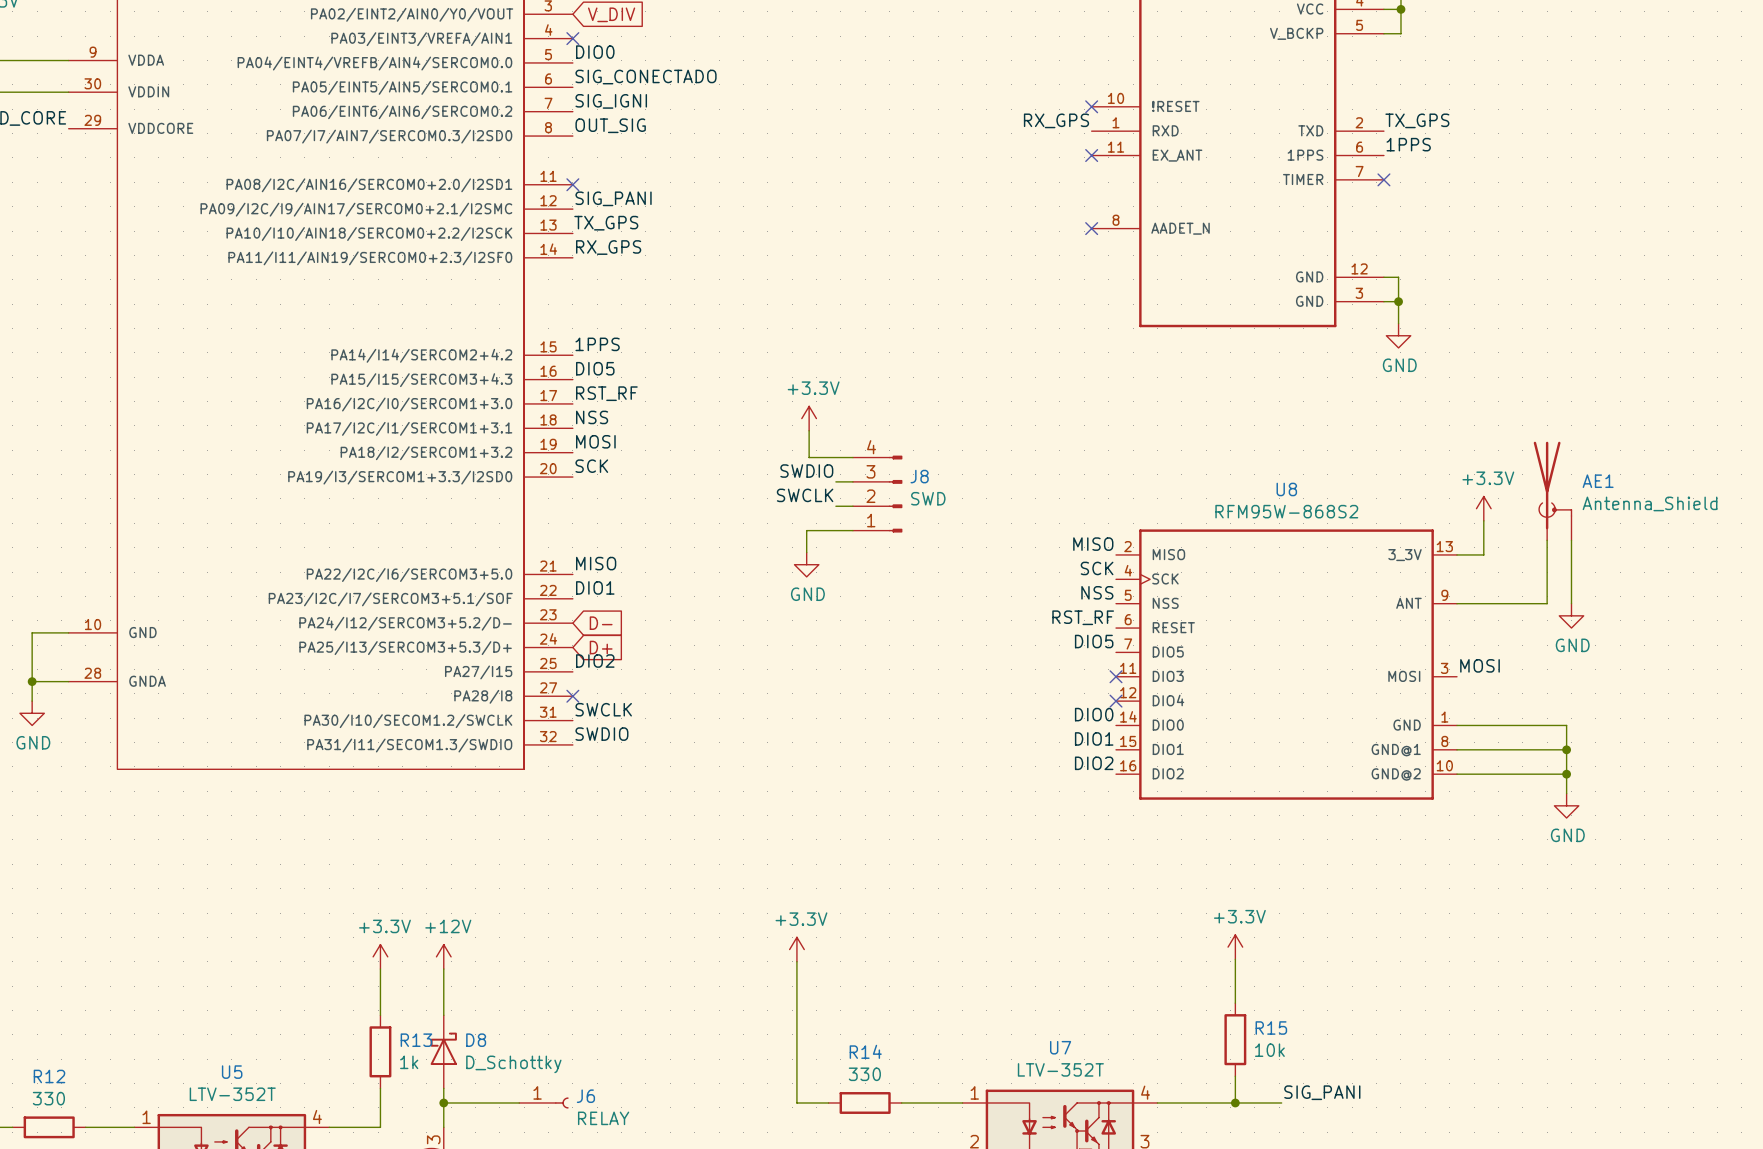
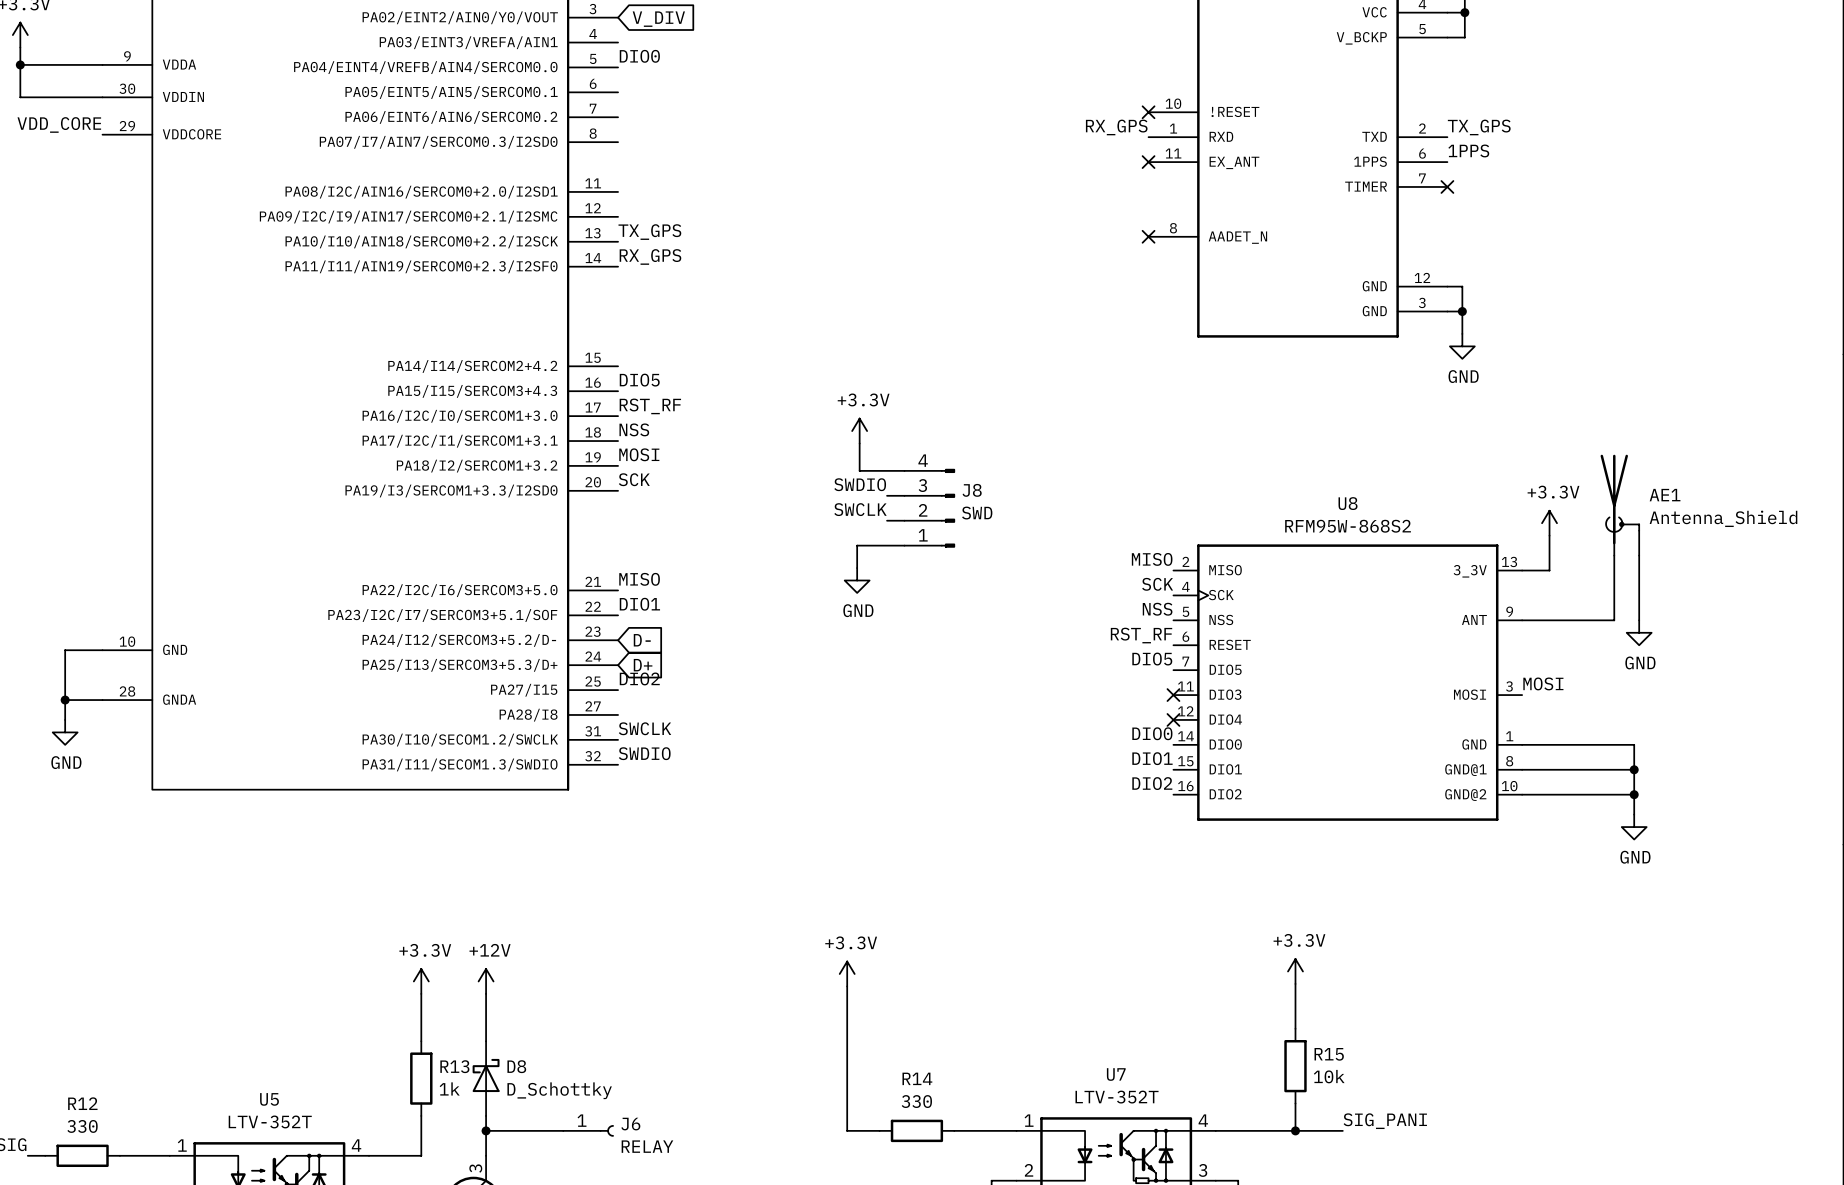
no-connect mark: (572, 38) -> none
label: SIG_CONECTADO (646, 77) -> none
label: SIG_IGNI (611, 101) -> none
label: OUT_SIG (610, 125) -> none
no-connect mark: (572, 184) -> none
label: SIG_PANI (613, 198) -> none
label: 1PPS (597, 344) -> none
no-connect mark: (572, 696) -> none

